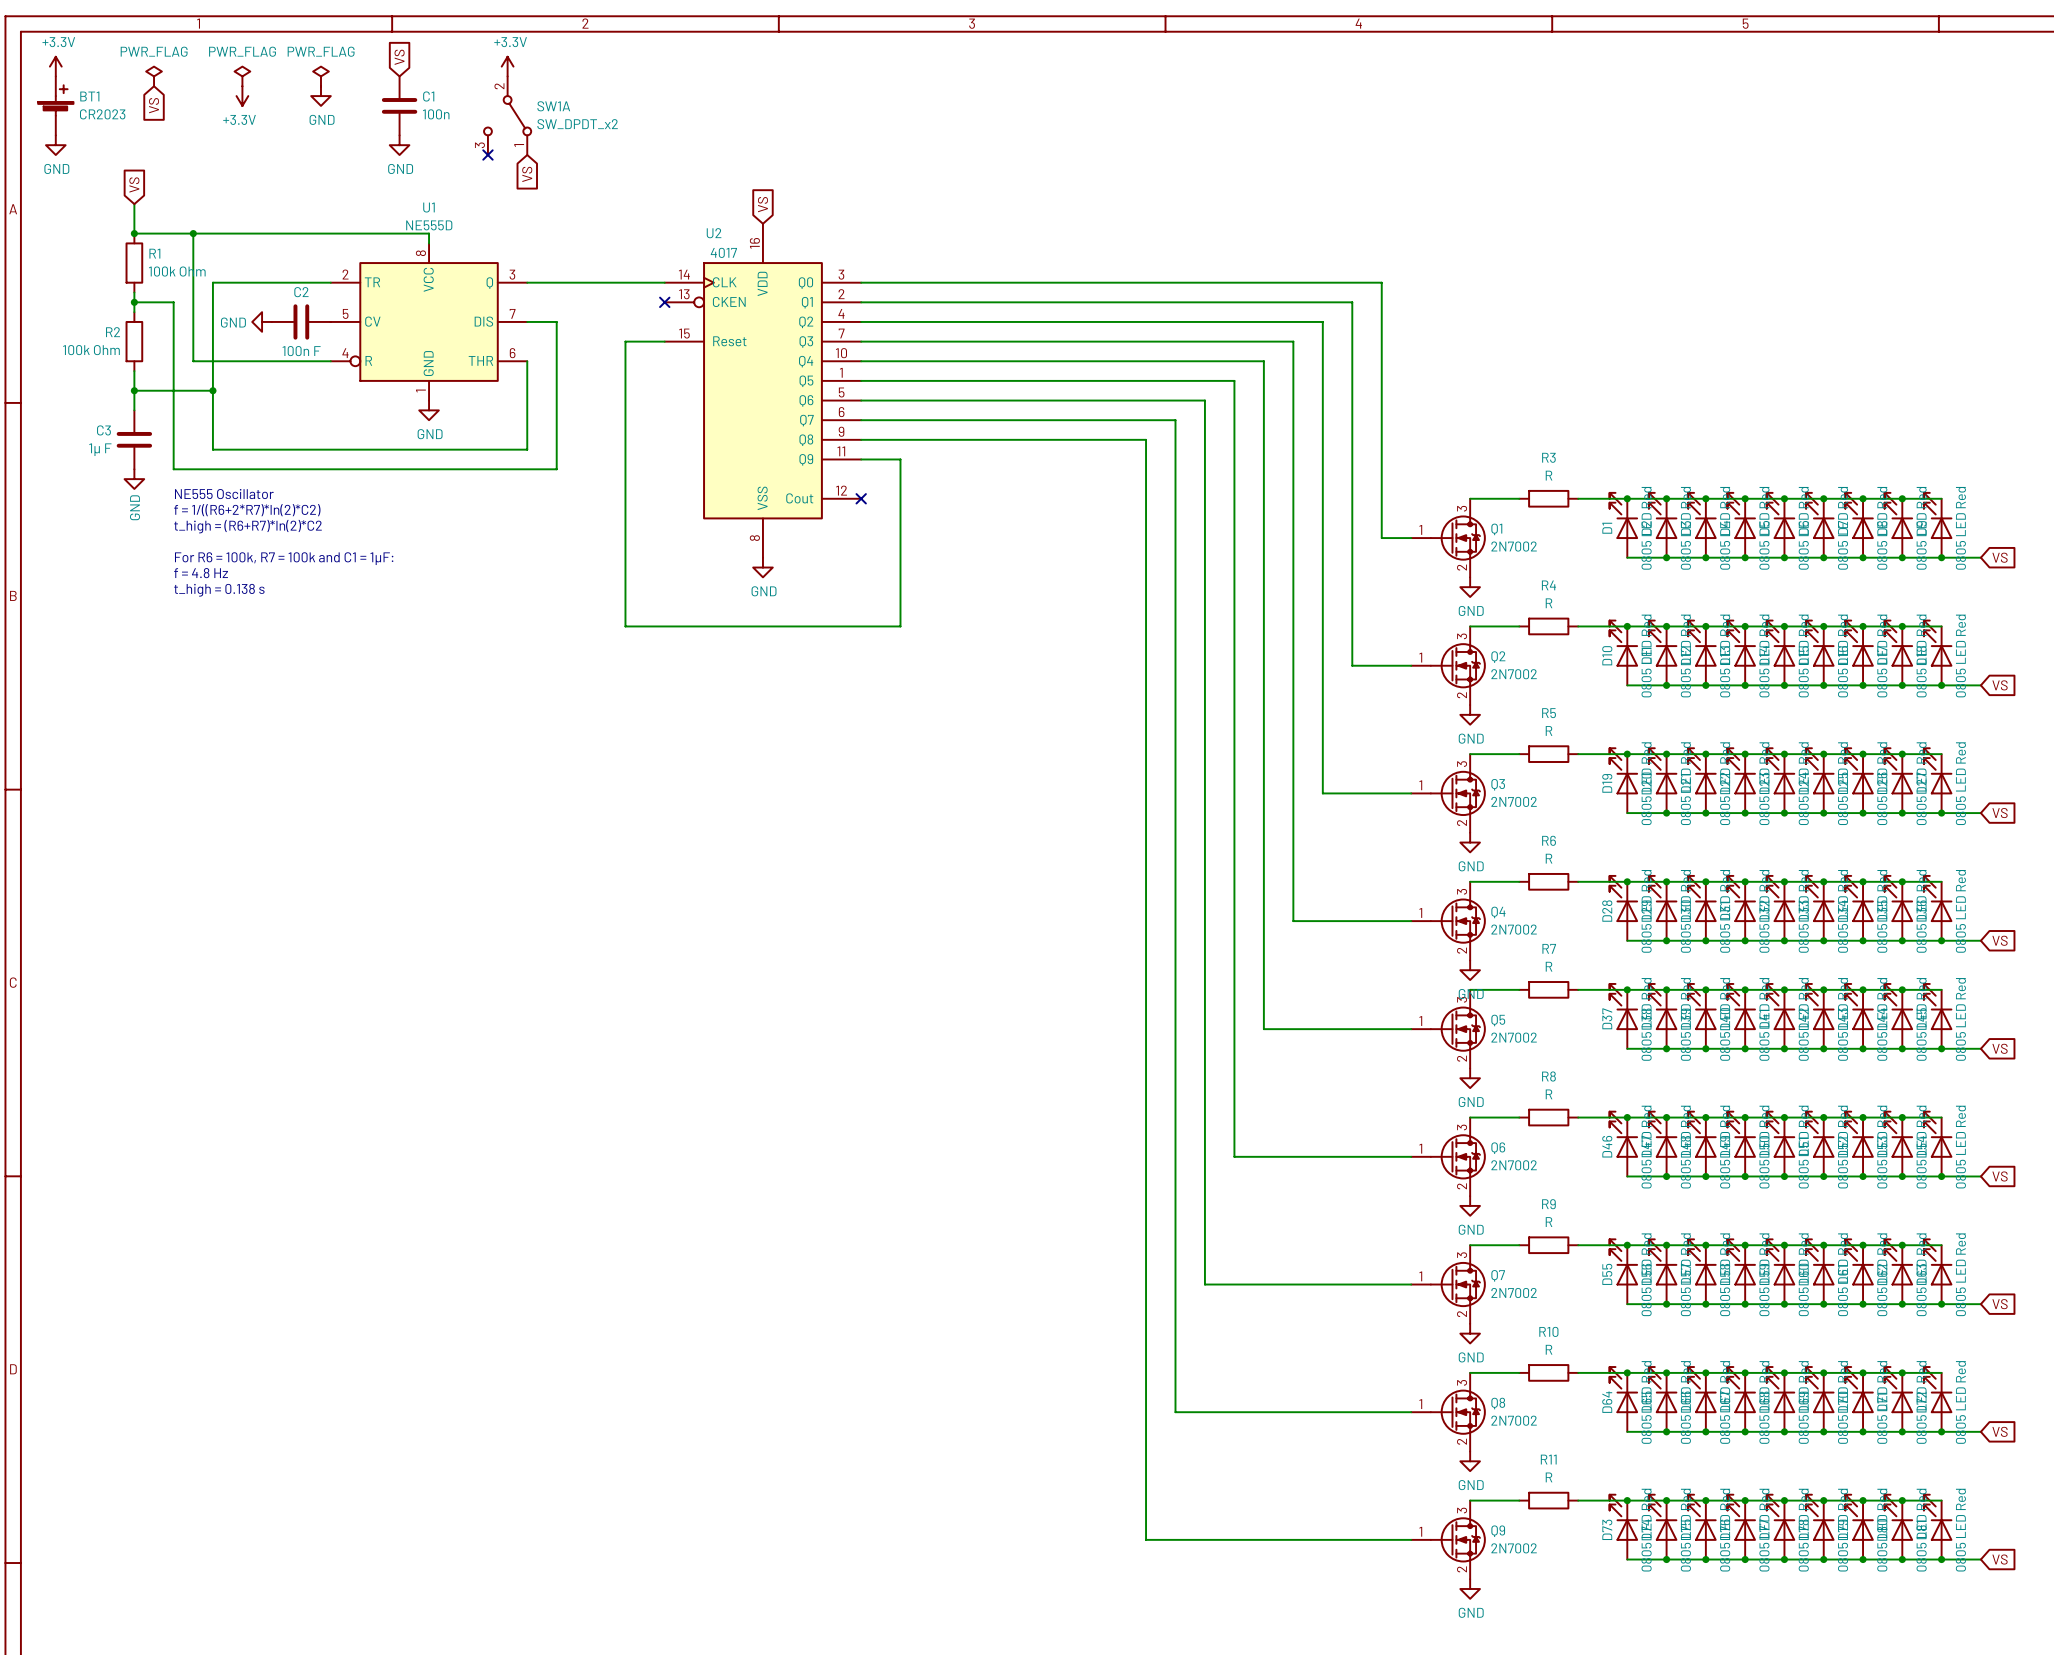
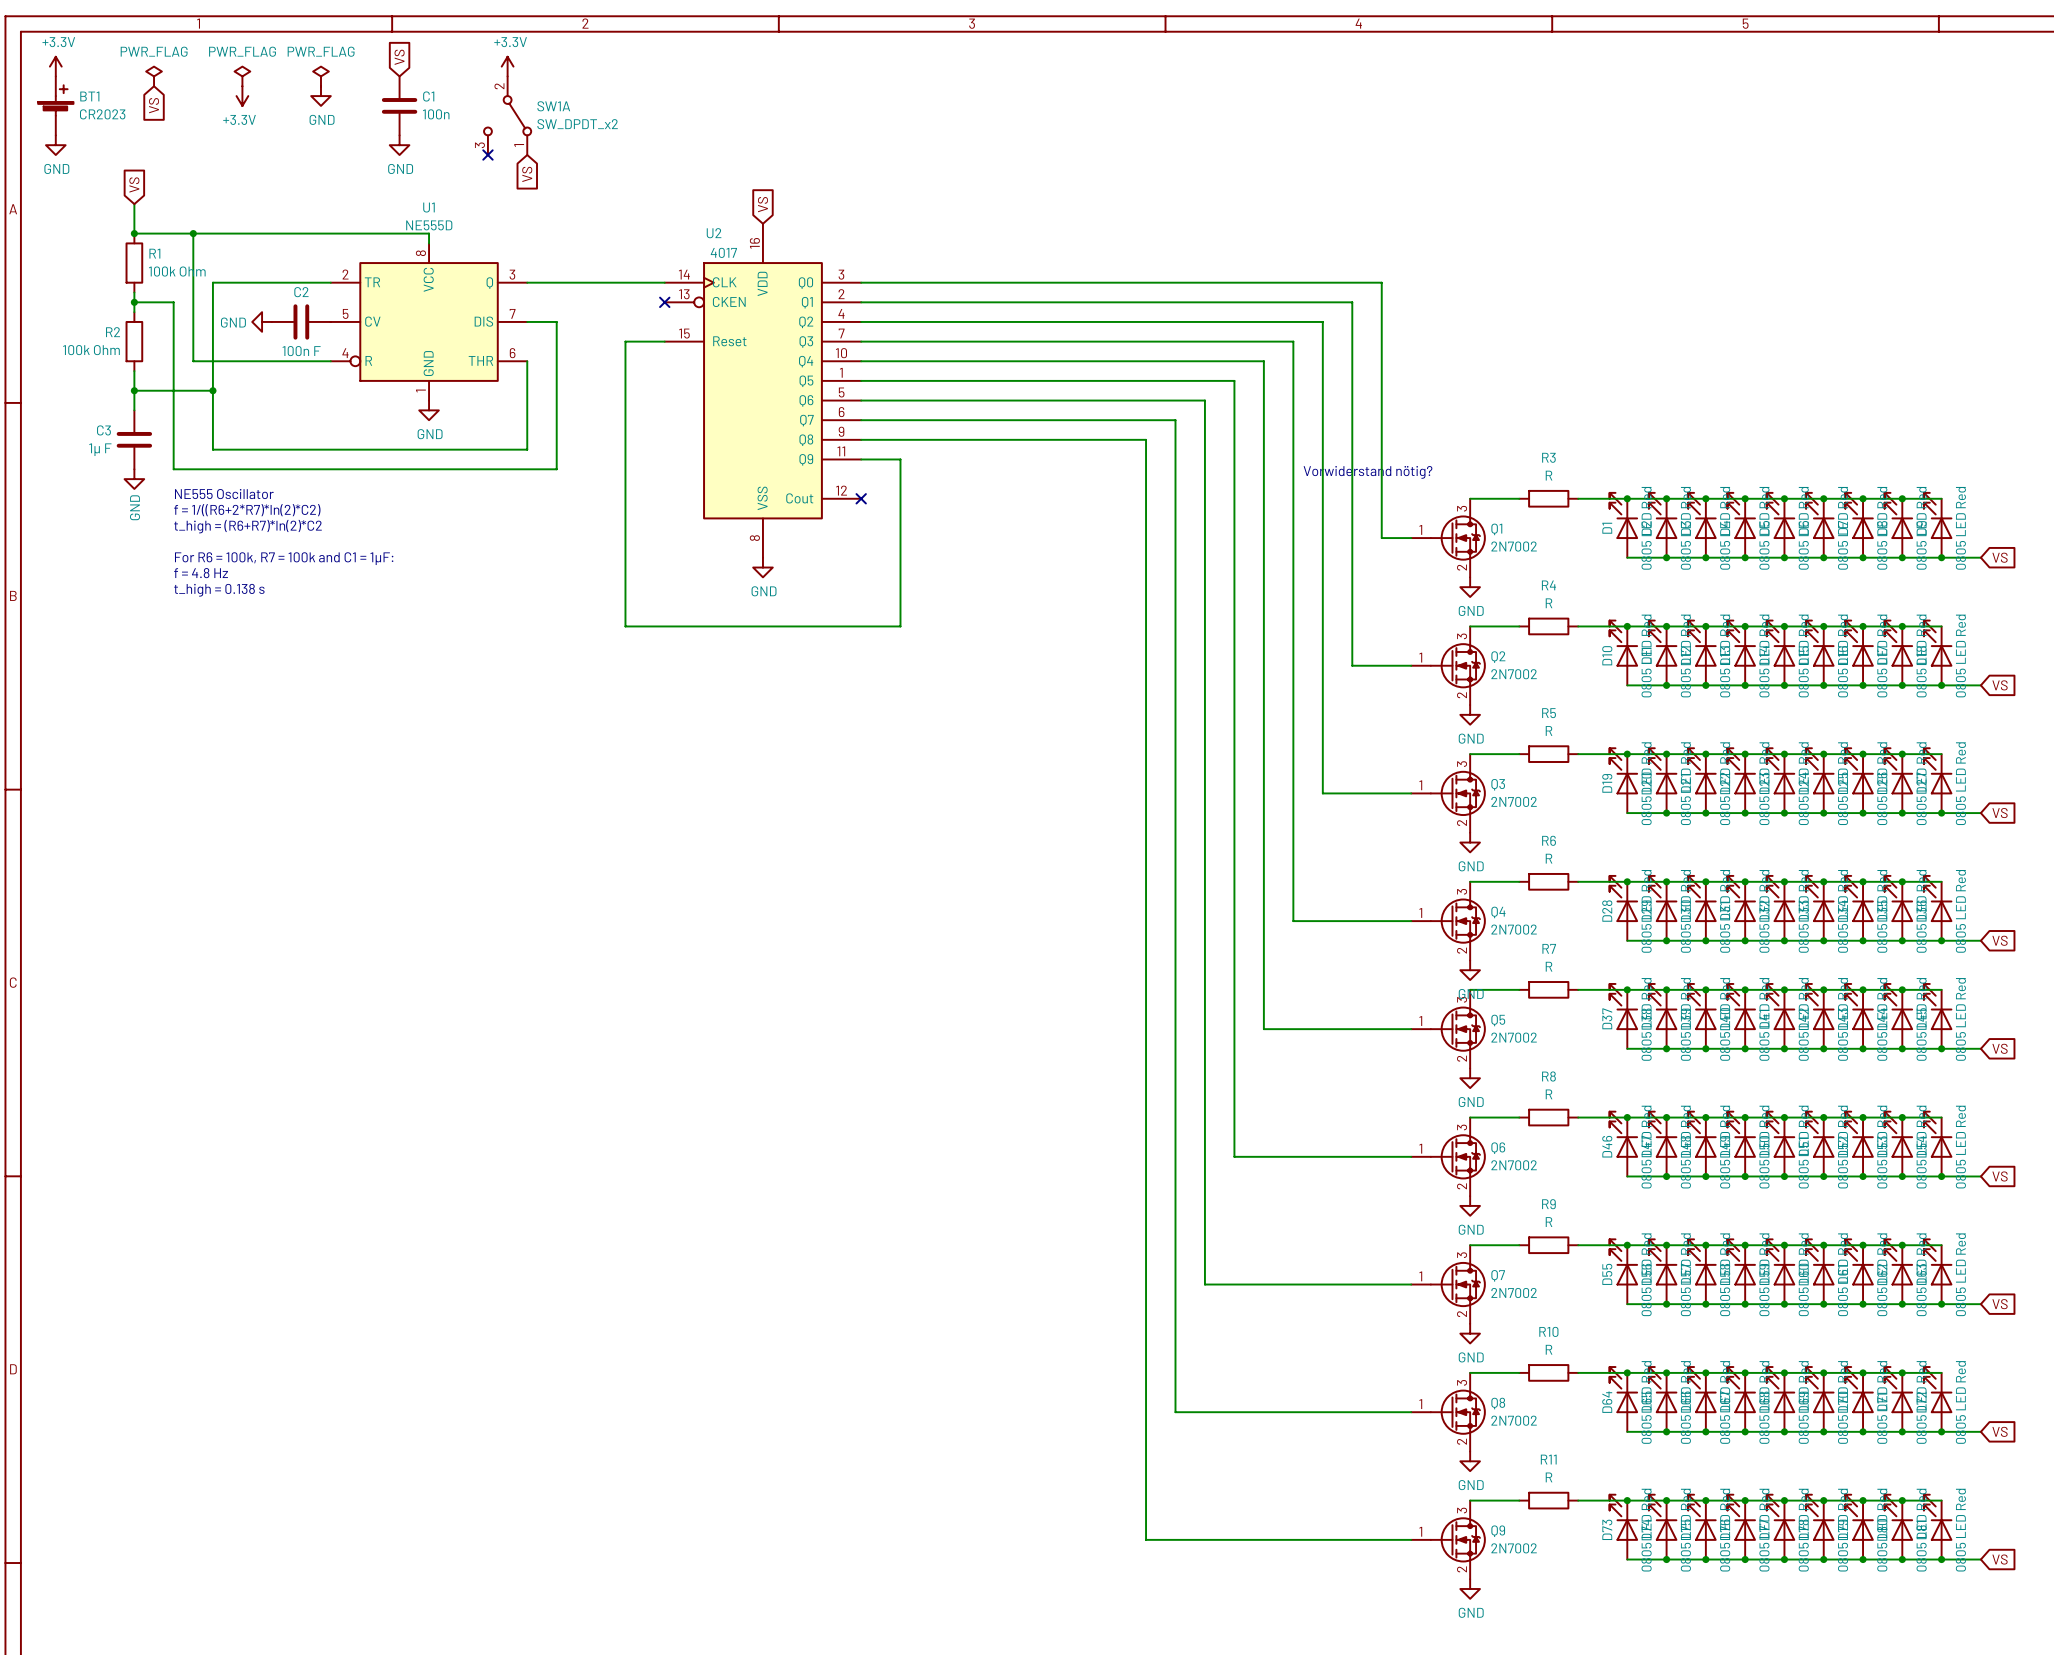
text: none -> Vorwiderstand nötig? (1368, 472)

